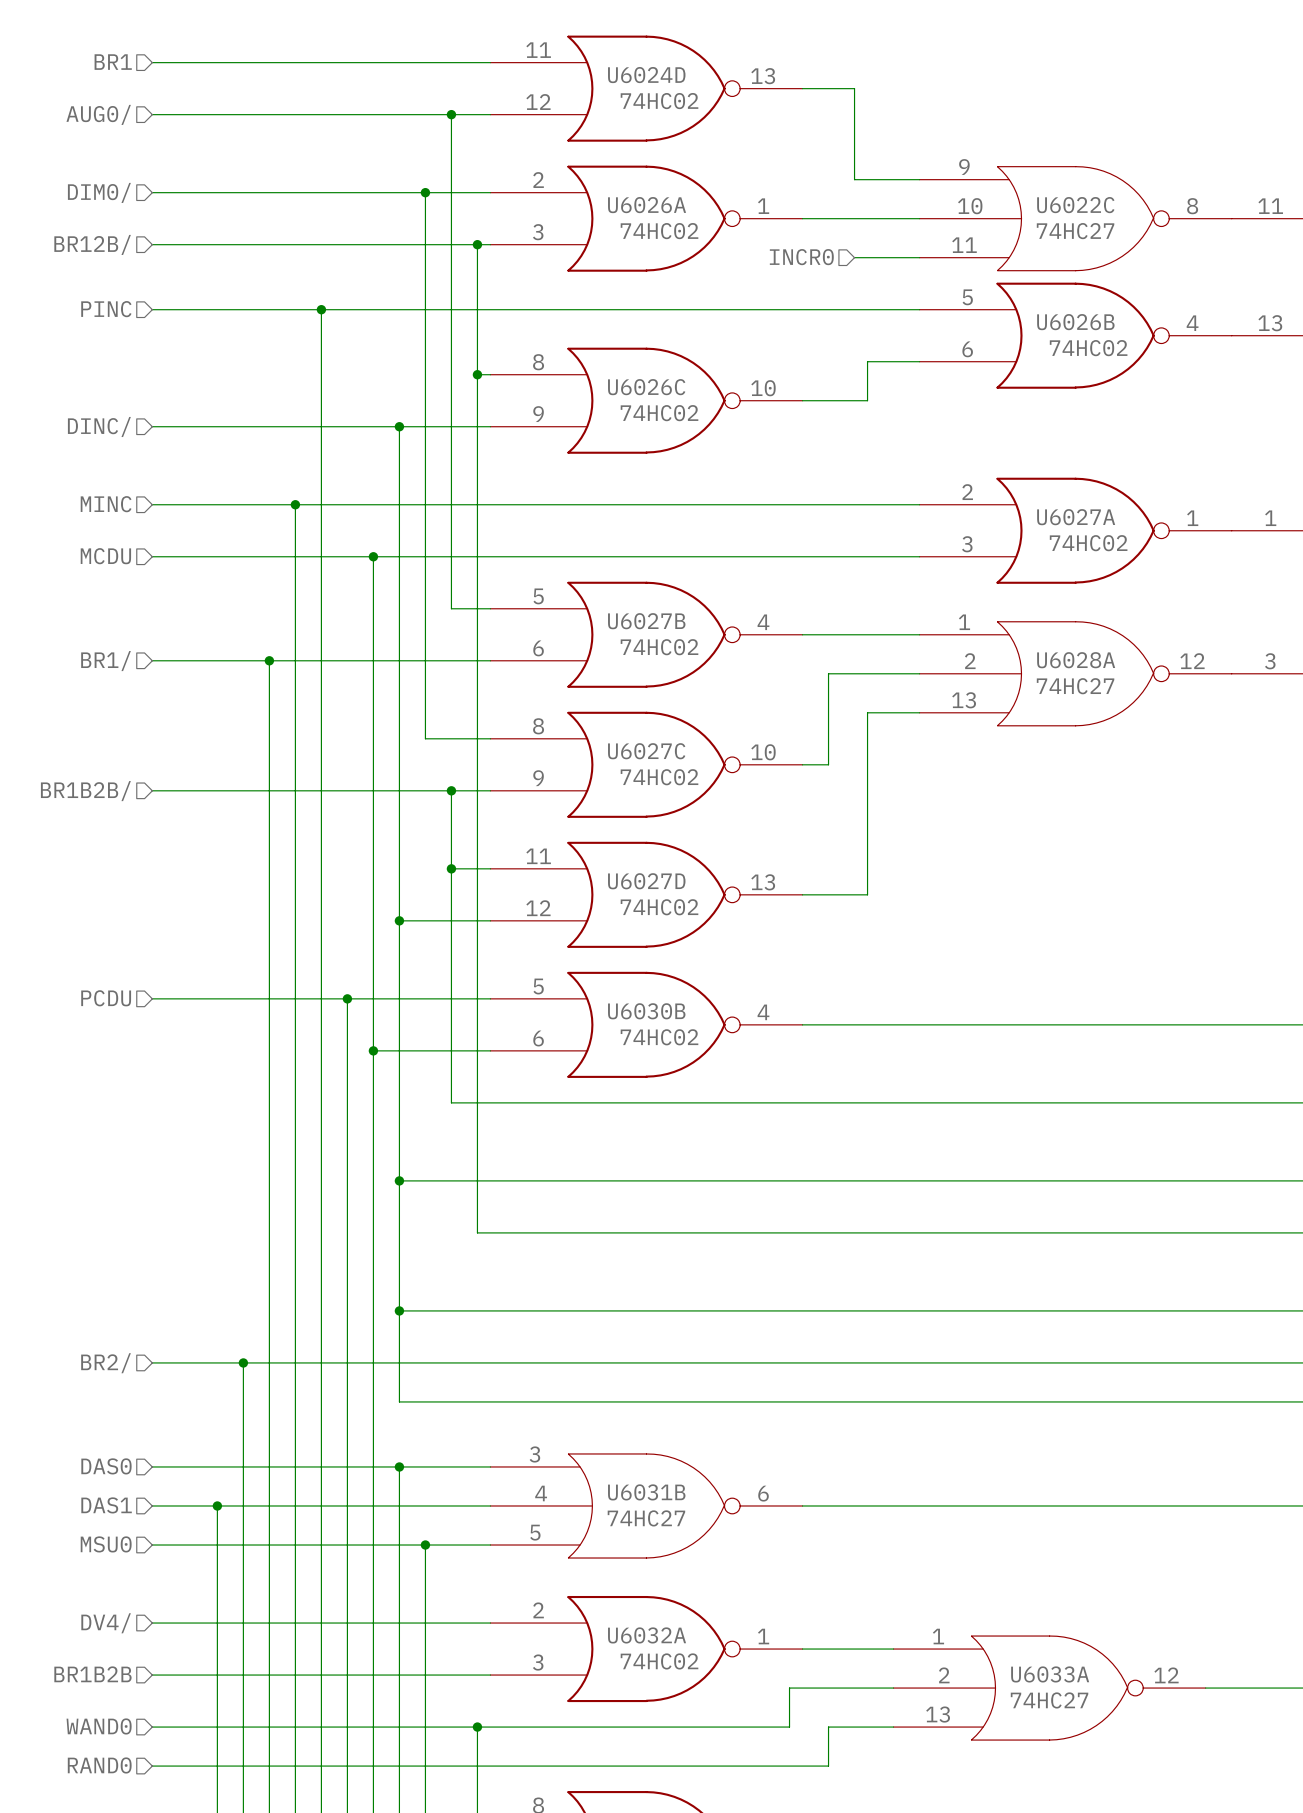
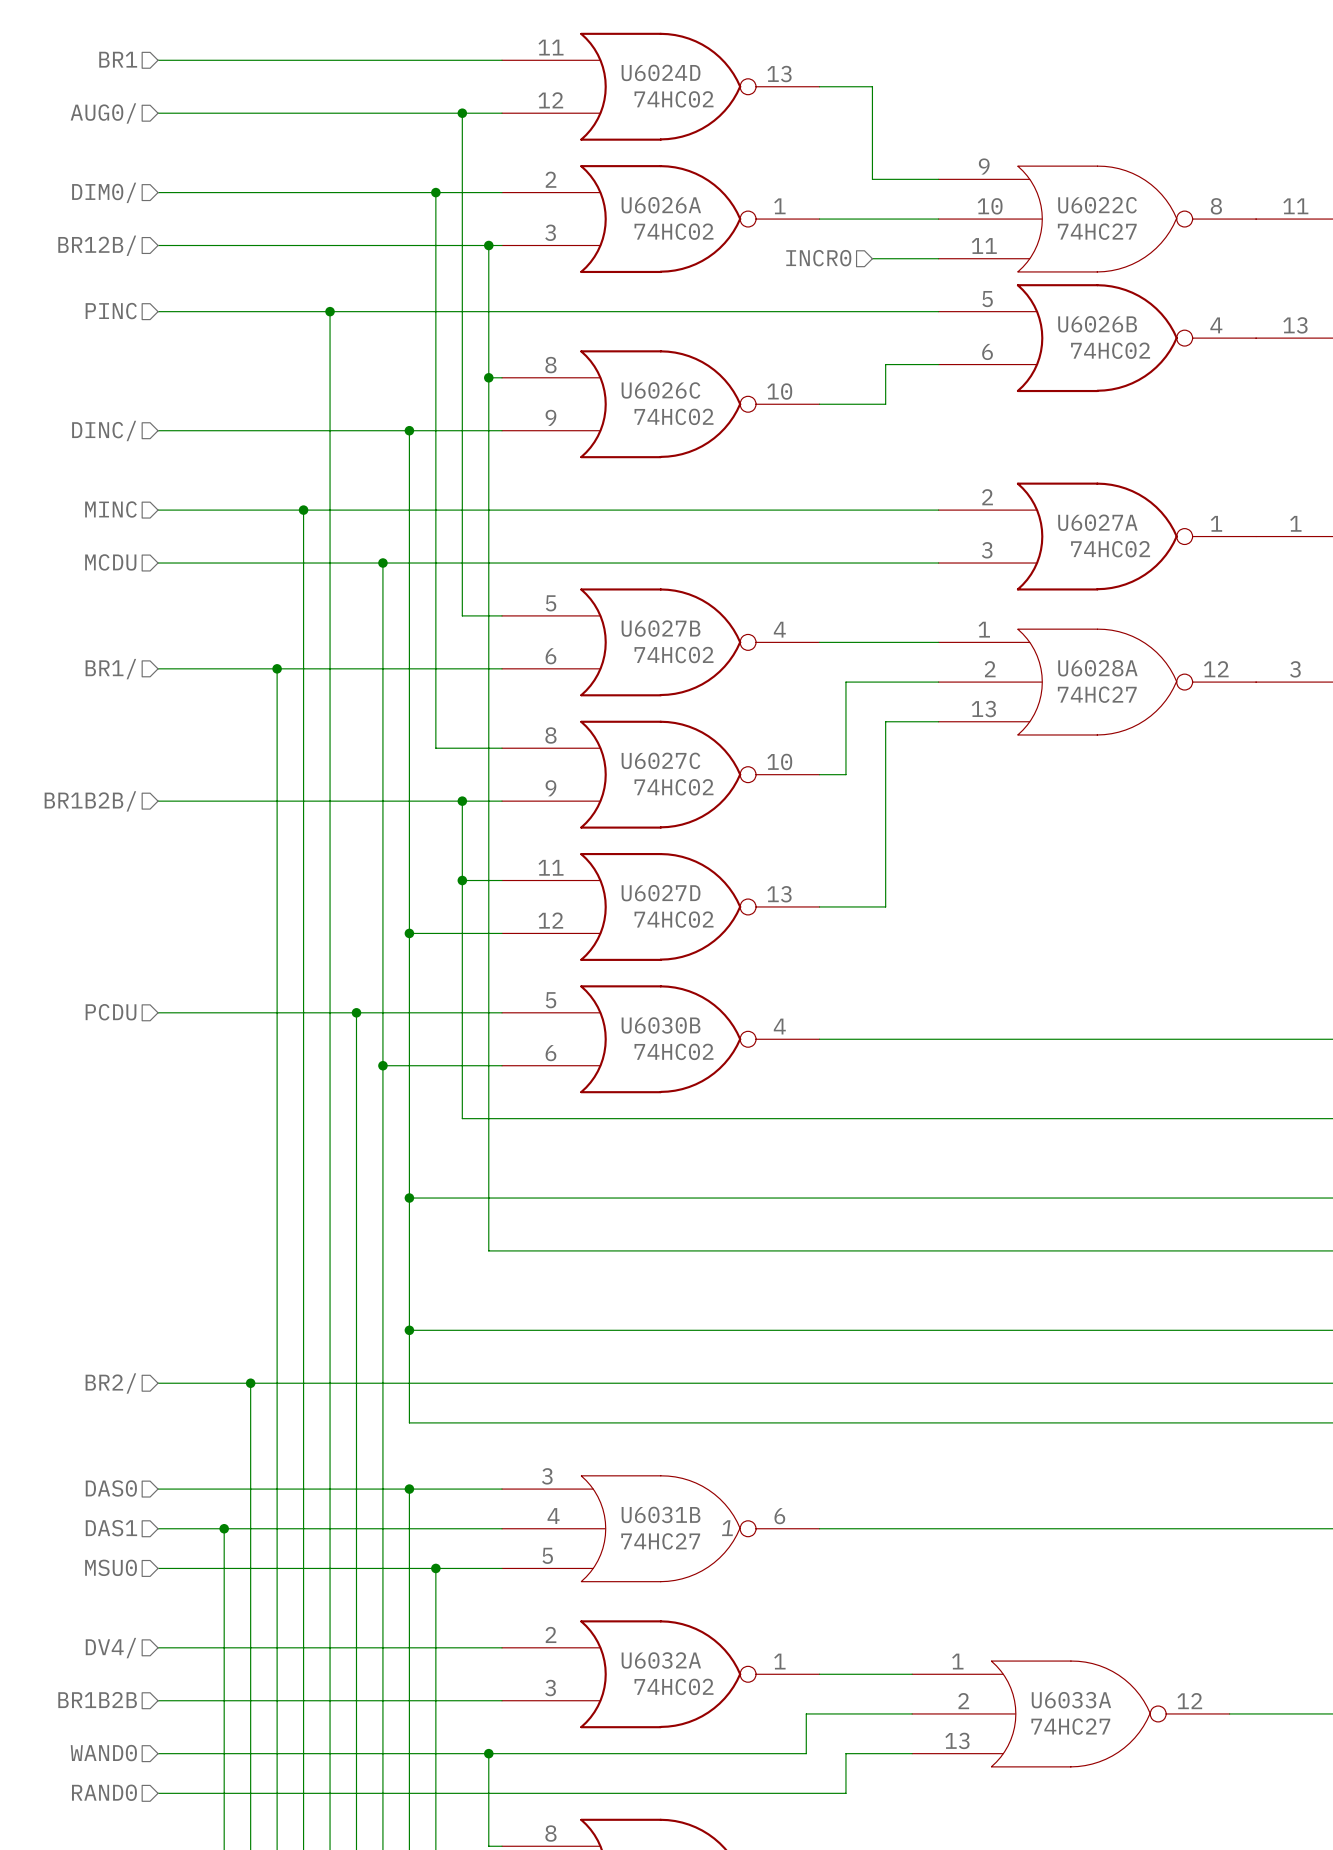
U6031B text: none -> 1 (727, 1528)

